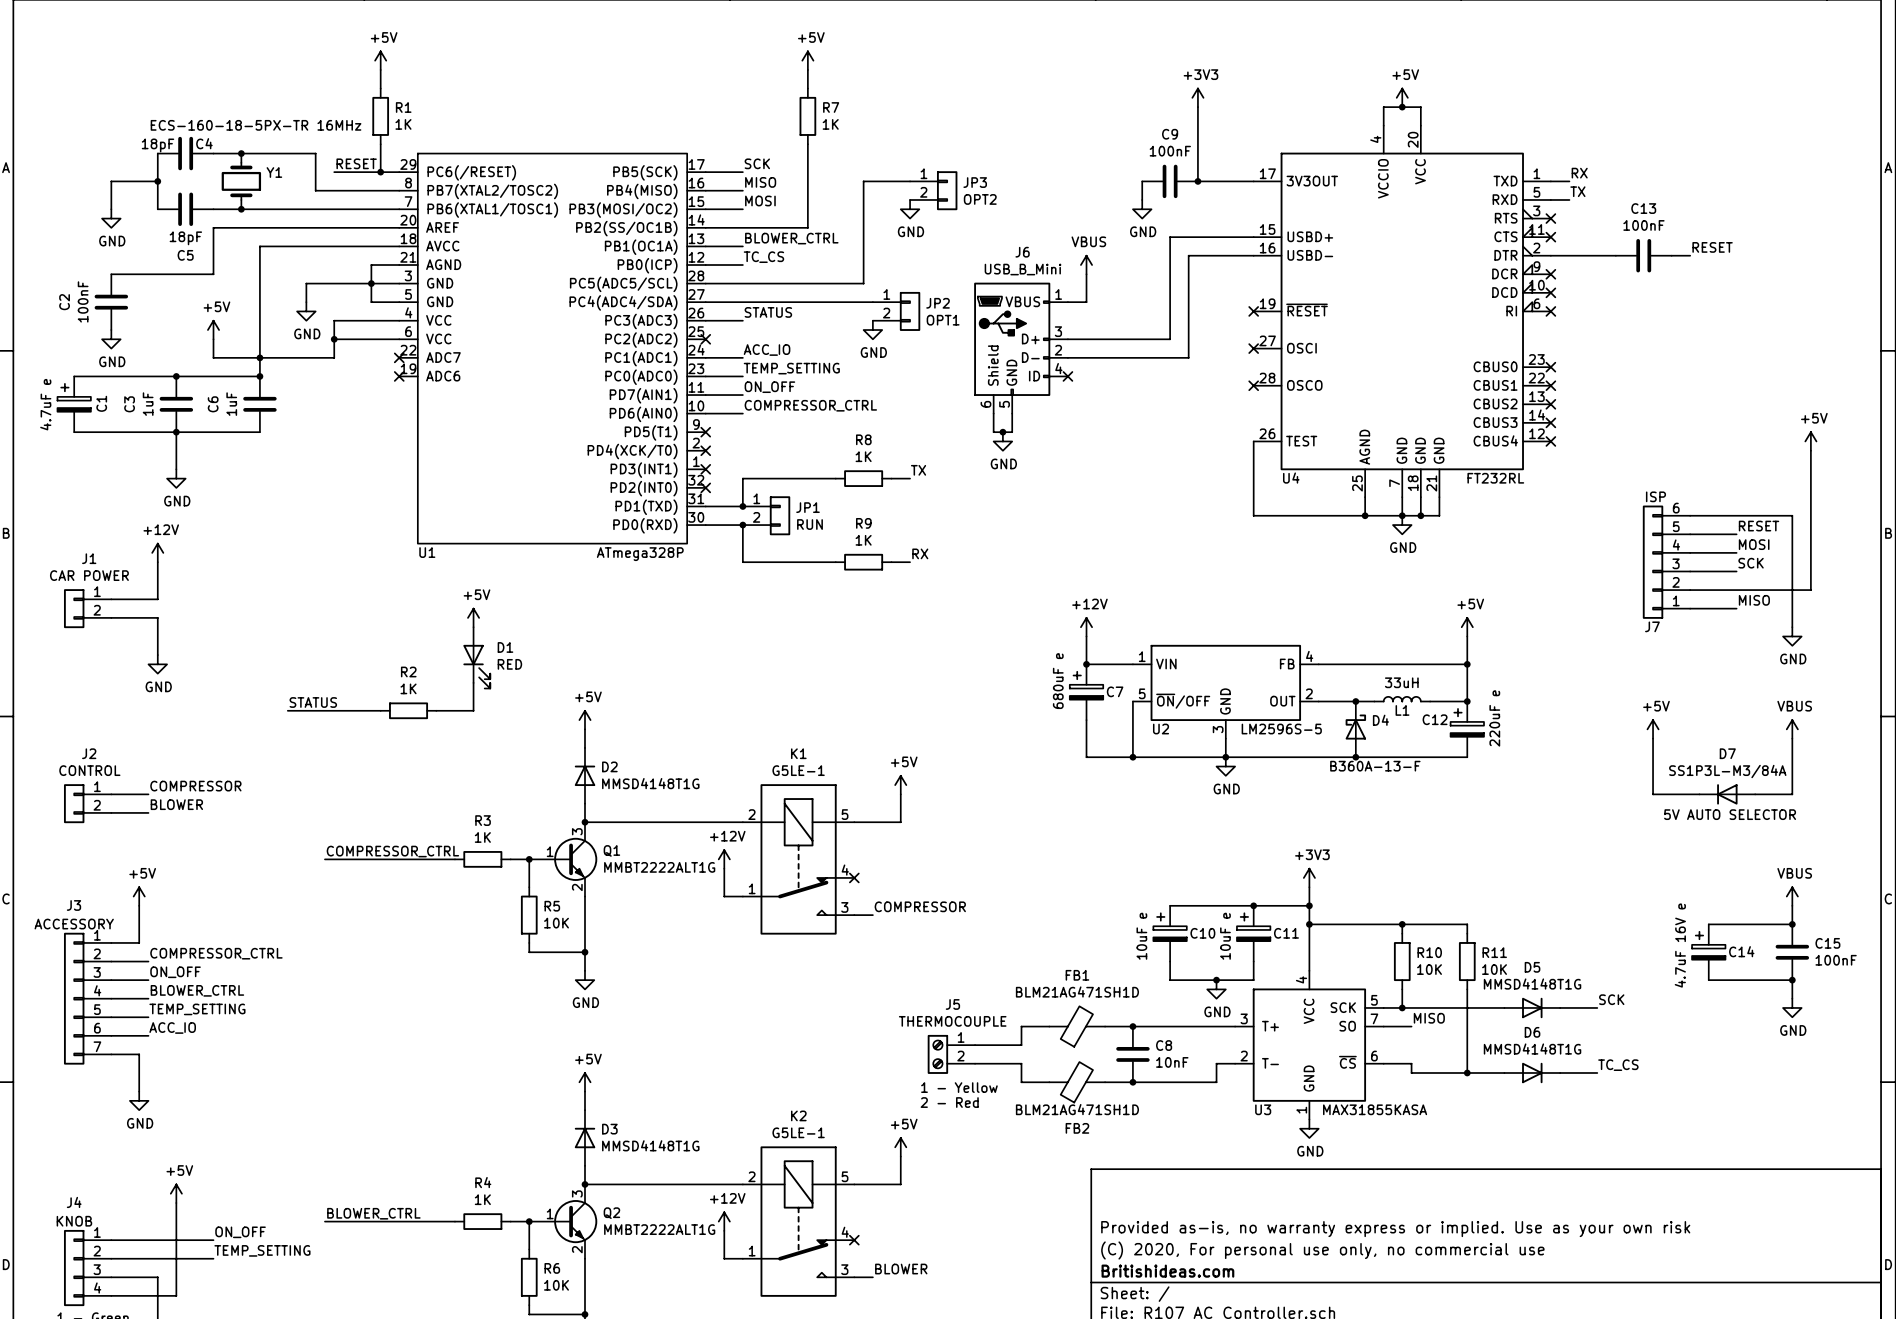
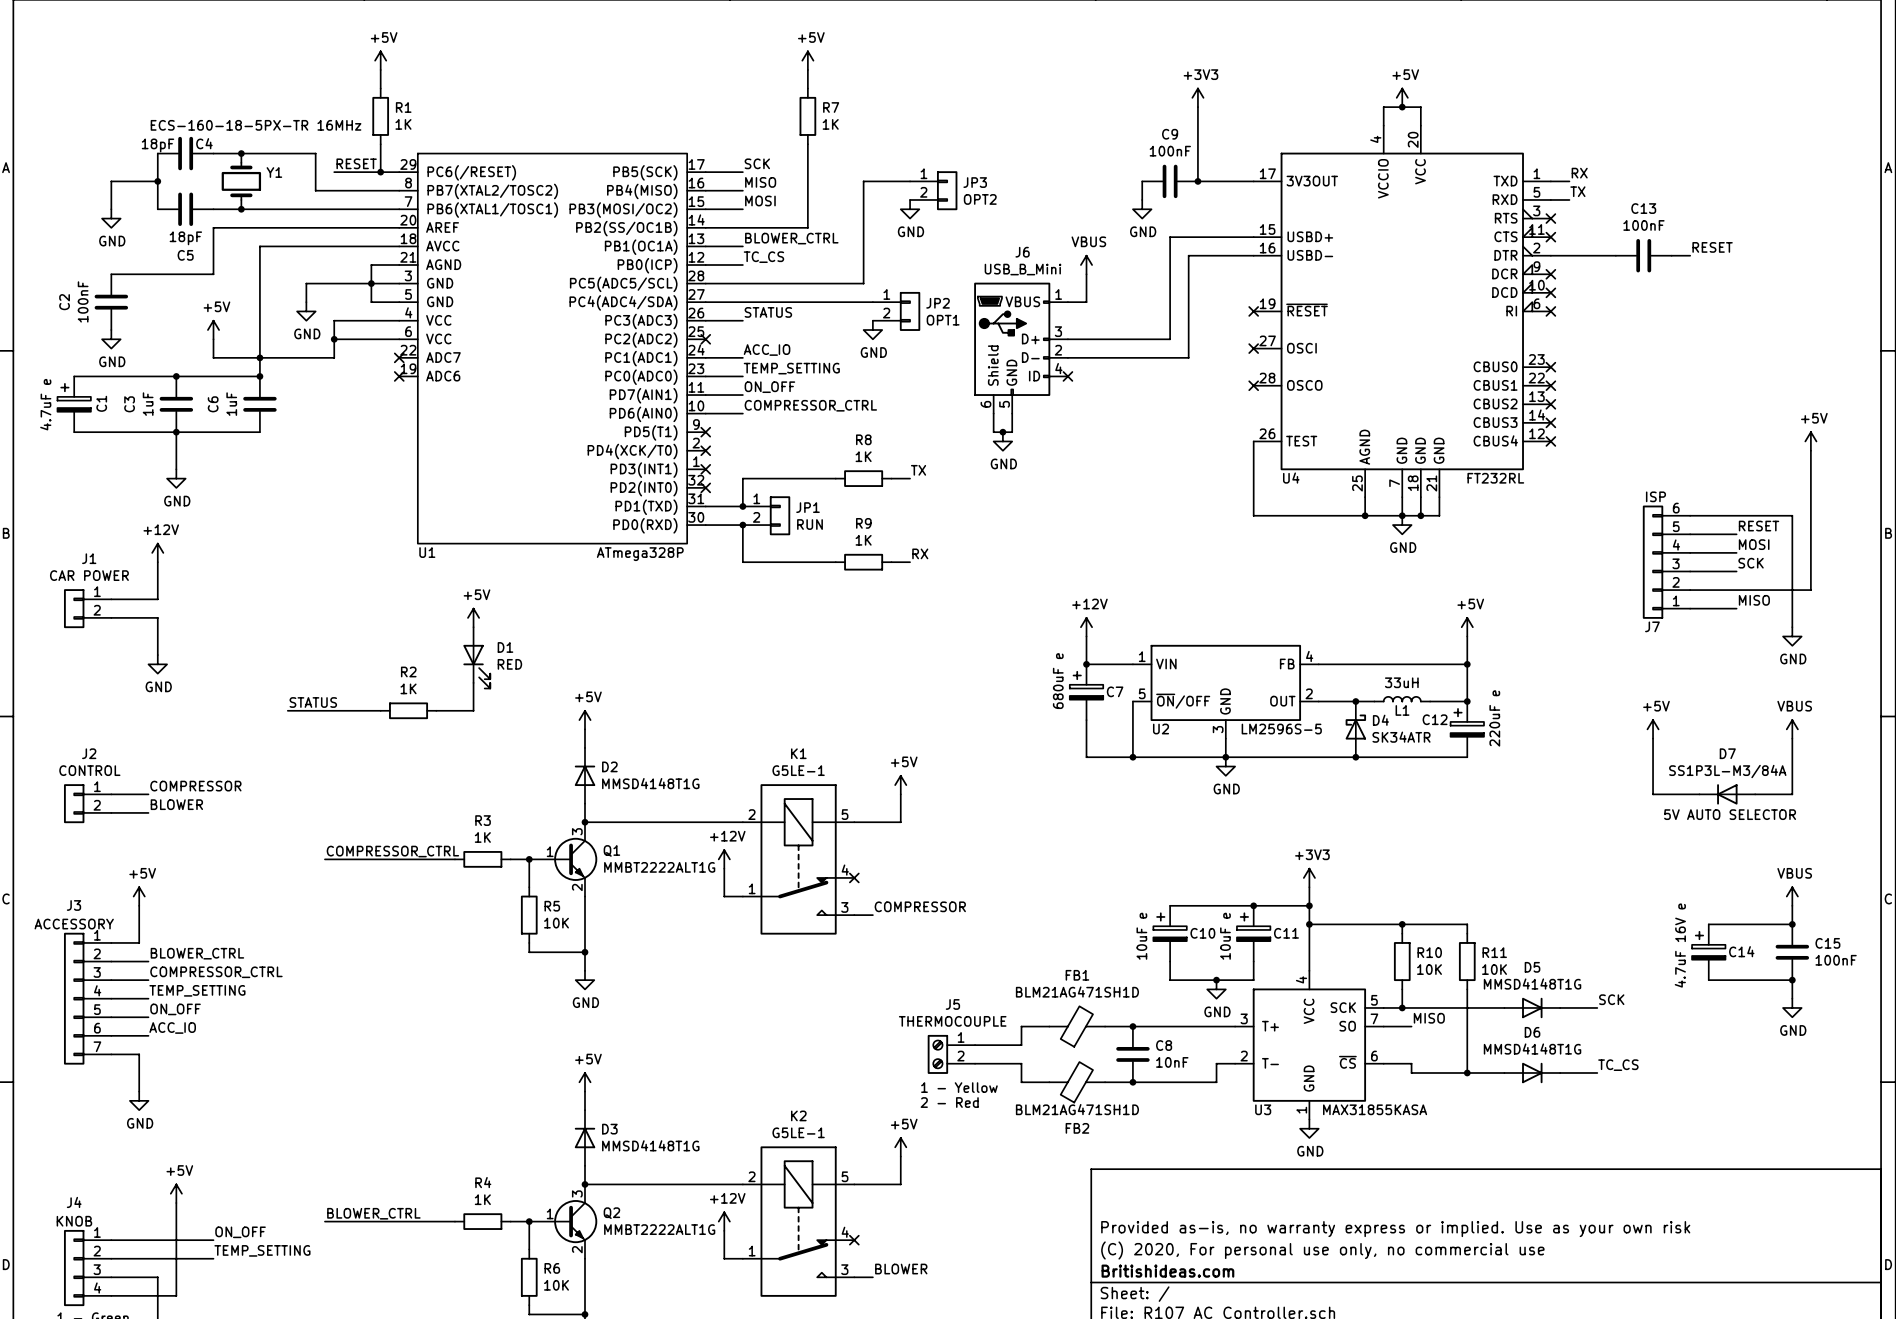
D4 value: B360A-13-F (1375, 766) -> SK34ATR (1401, 737)
label: COMPRESSOR_CTRL (216, 953) -> BLOWER_CTRL (197, 953)
label: ON_OFF (175, 972) -> COMPRESSOR_CTRL (216, 972)
label: BLOWER_CTRL (197, 990) -> TEMP_SETTING (197, 990)
label: TEMP_SETTING (197, 1009) -> ON_OFF (175, 1009)

